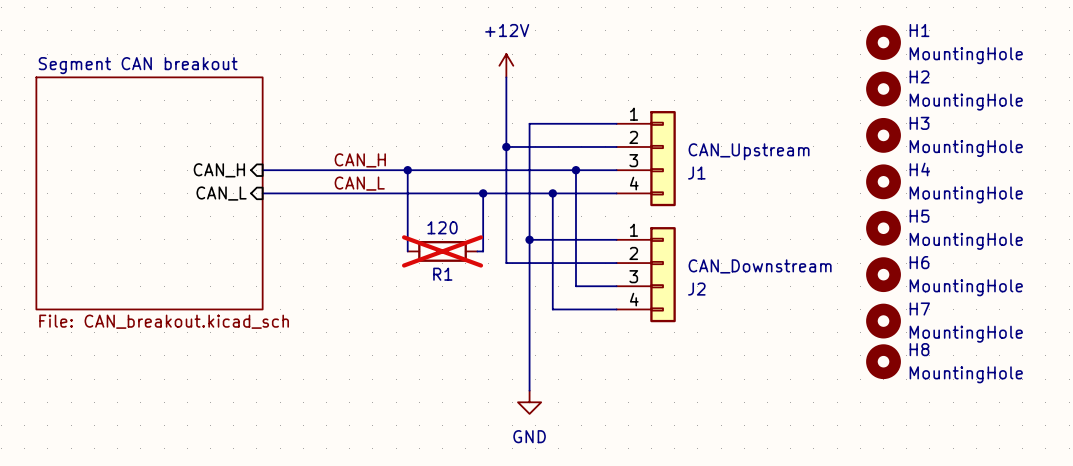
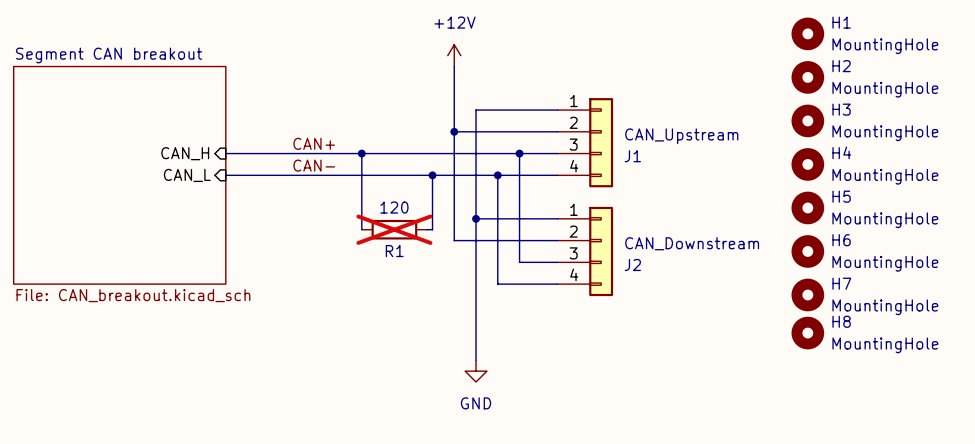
label: CAN_H (360, 160) -> CAN+ (314, 143)
label: CAN_L (359, 183) -> CAN- (314, 165)

